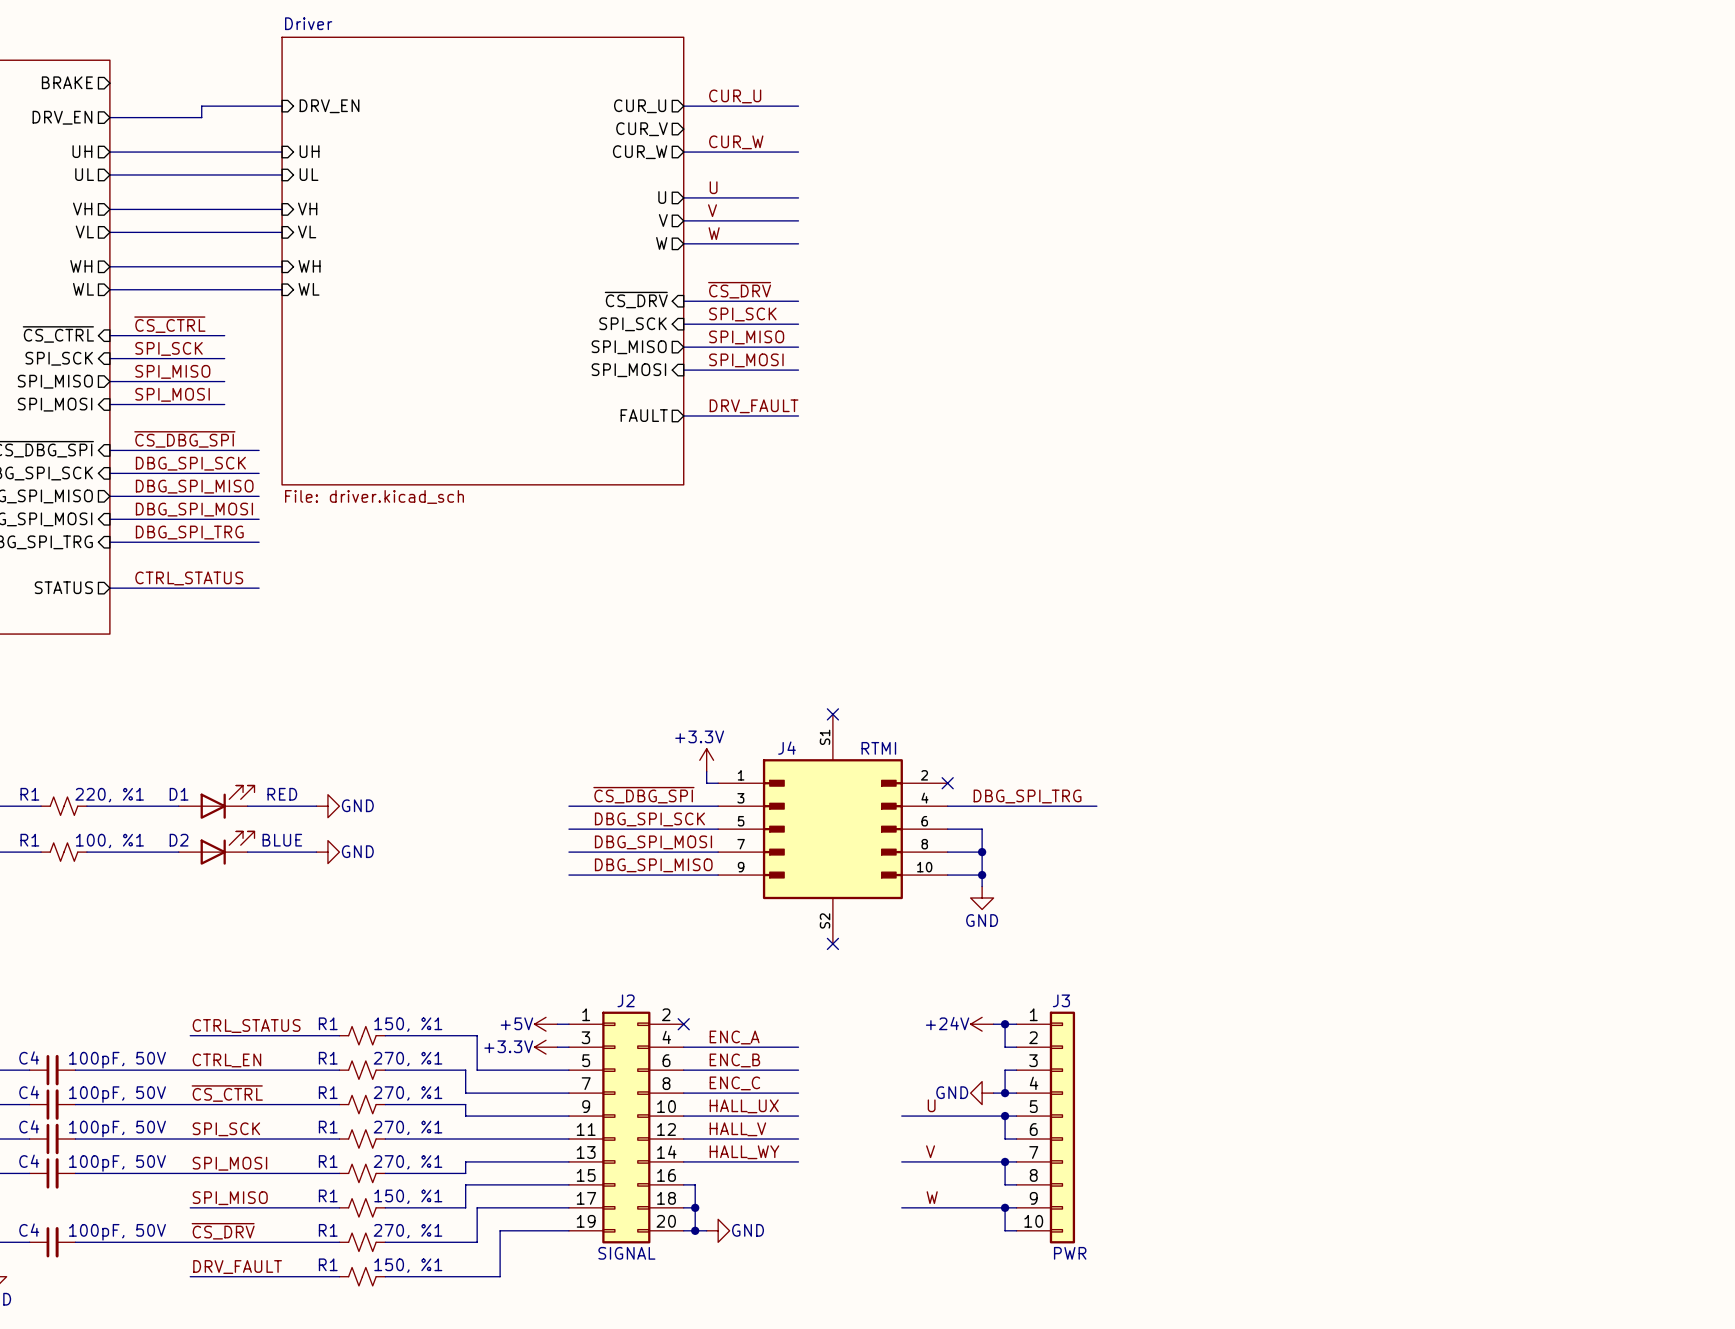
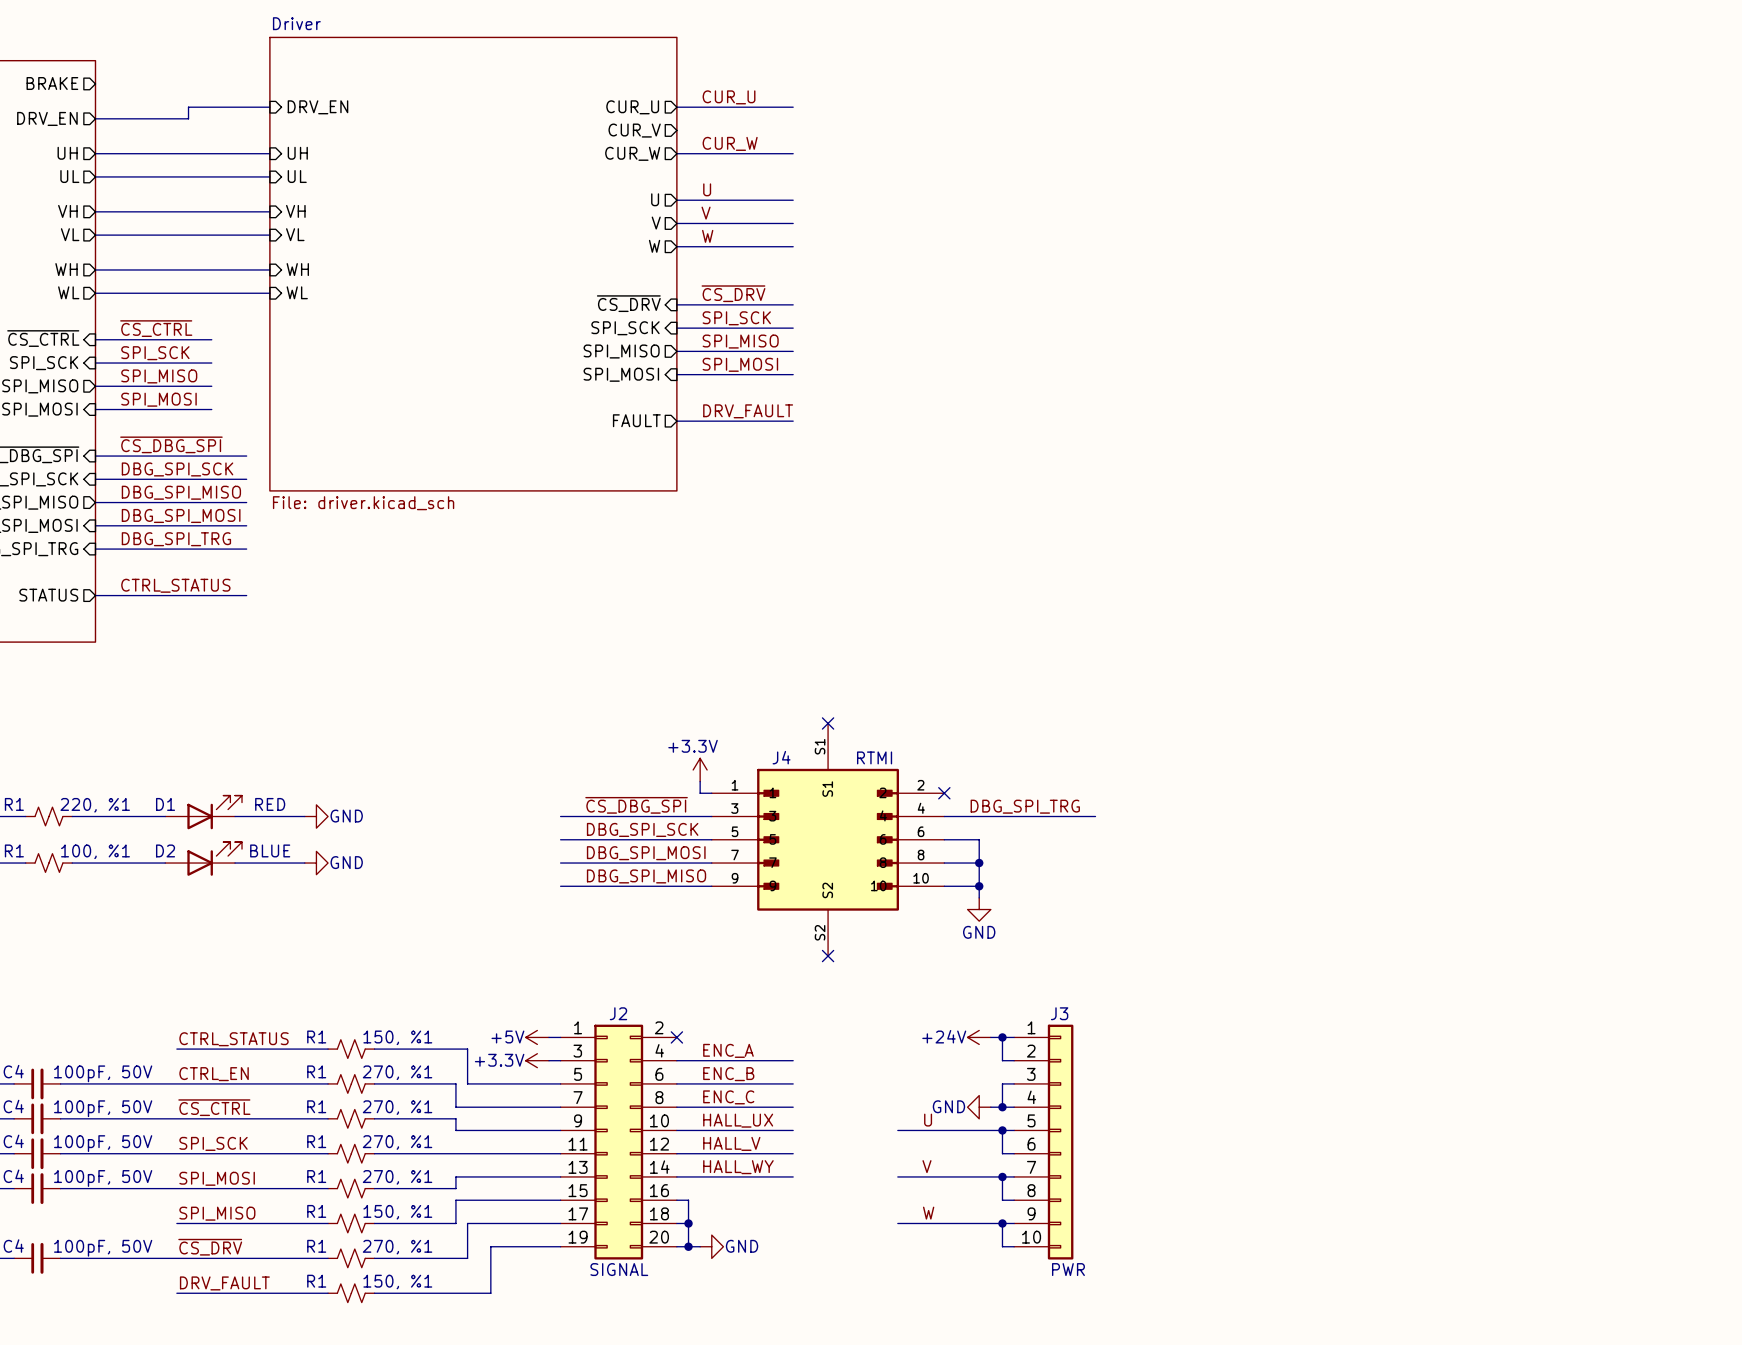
J4 symbol: [718, 714, 948, 944] -> [711, 723, 945, 957]

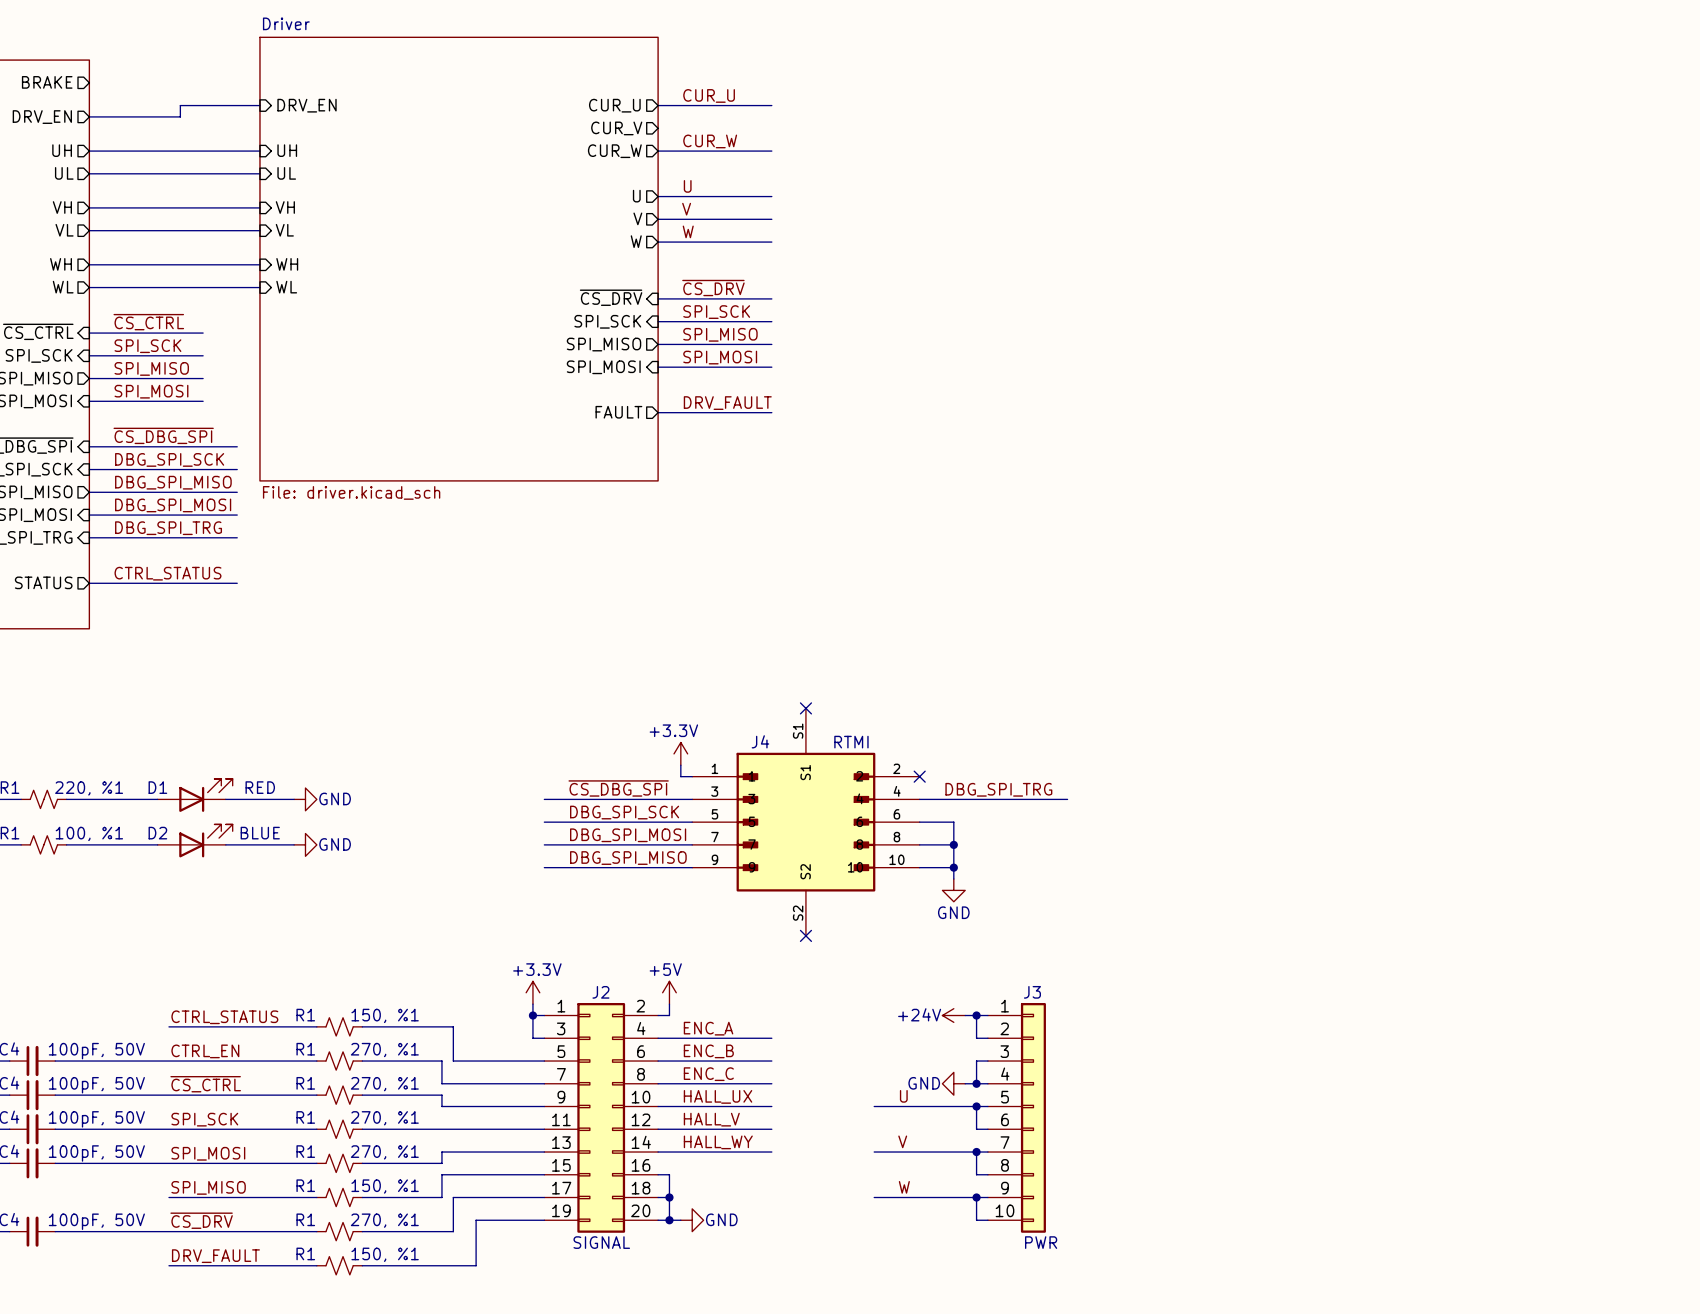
wire: none -> (532, 1004) (532, 1038)
wire: none -> (669, 1004) (669, 1015) (658, 1015)
power symbol rotation: 0° (537, 1037) -> 90° clockwise (669, 992)
power symbol position: +5V (537, 1037) -> +5V (669, 992)
junction: none -> (532, 1015)
no-connect mark: (676, 1037) -> none
power symbol text position: +3.3V (499, 1060) -> +3.3V (537, 969)
power symbol rotation: 0° (537, 1060) -> 90° clockwise (532, 992)
power symbol position: +3.3V (537, 1060) -> +3.3V (532, 992)

